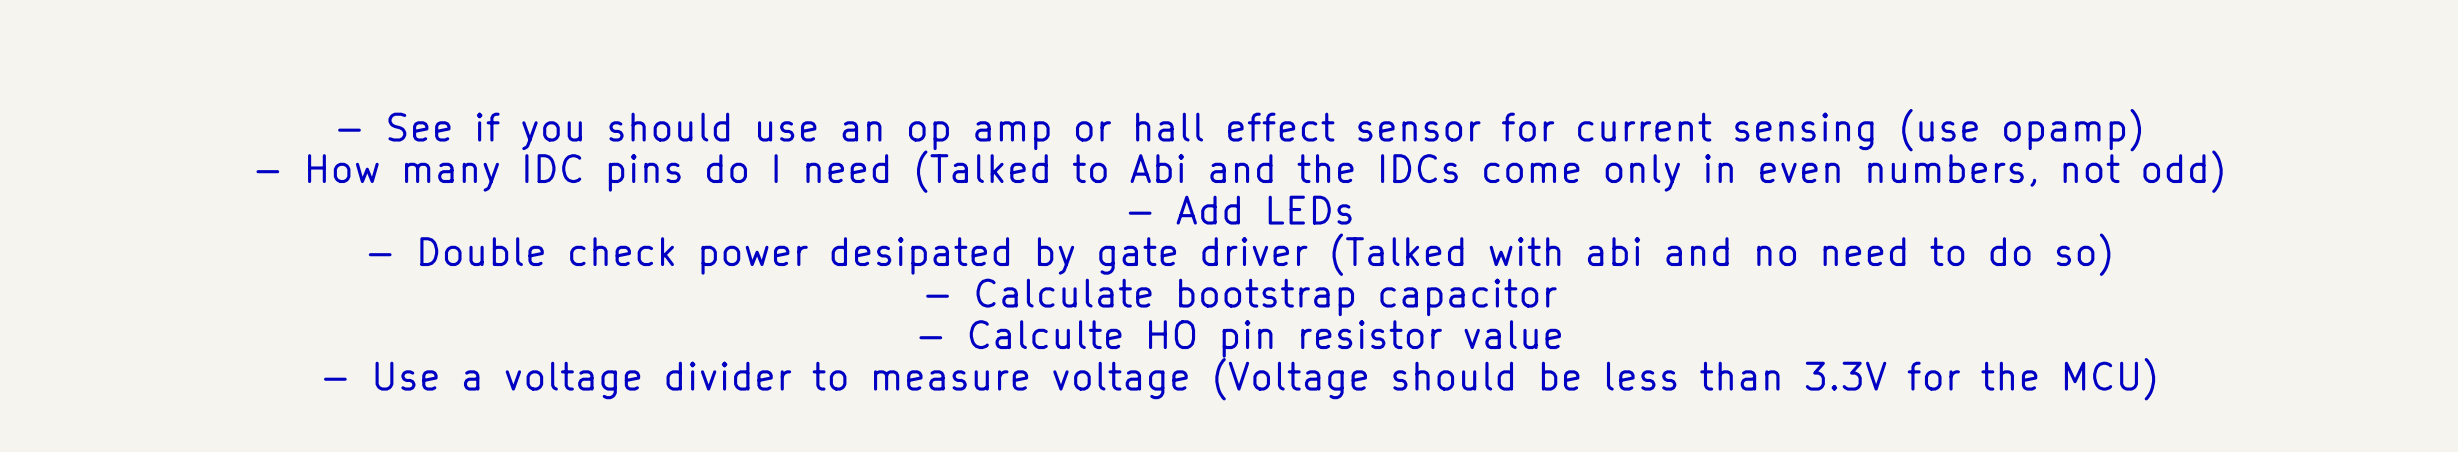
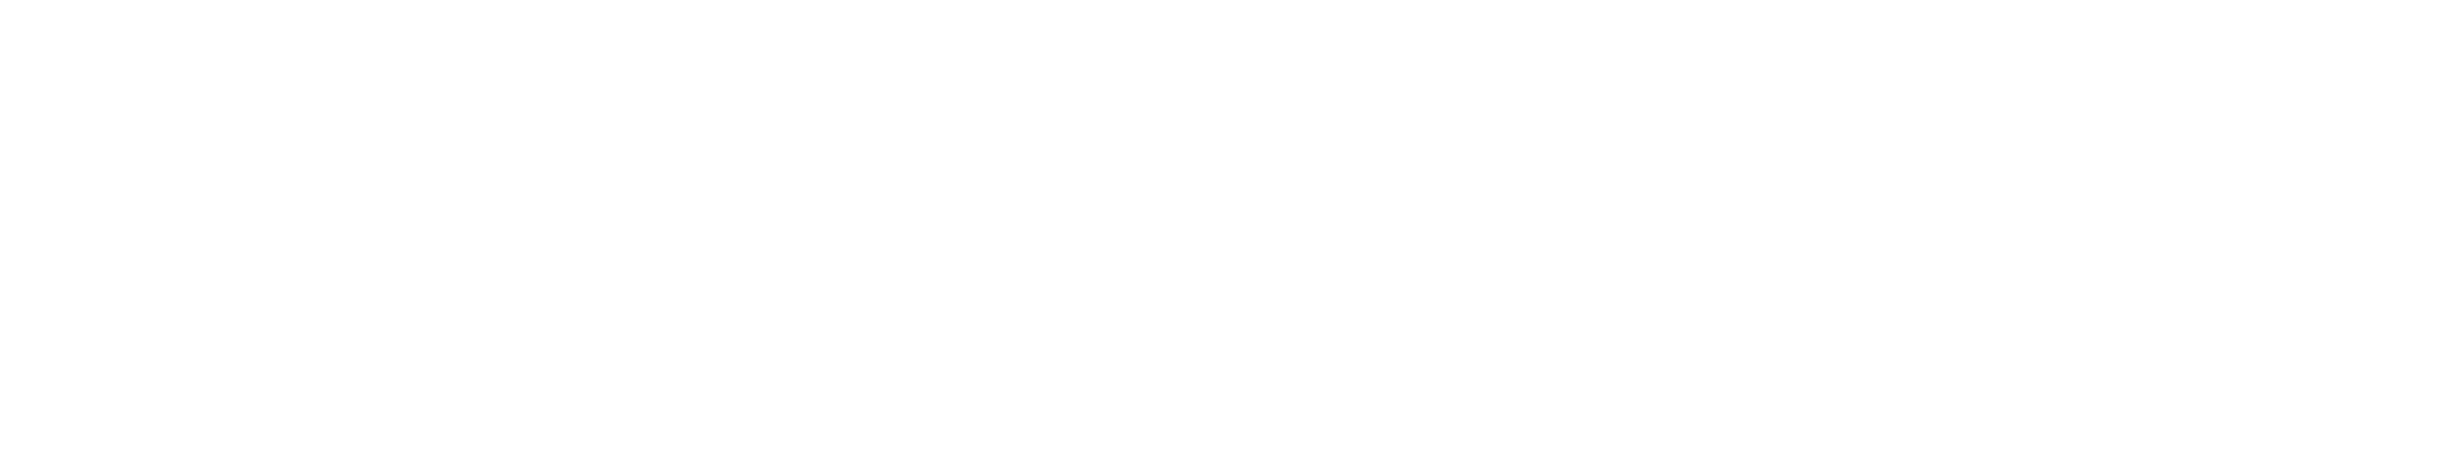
text: - See if you should use an op amp or hall effect sensor for current sensing (use opamp) (1239, 130) -> none
text: - How many IDC pins do I need (Talked to Abi and the IDCs come only in even numbers, not odd) (1239, 171) -> none
text: - Add LEDs (1240, 210) -> none
text: - Double check power desipated by gate driver (Talked with abi and no need to do so) (1239, 254) -> none
text: - Calculate bootstrap capacitor (1241, 297) -> none
text: - Calculte HO pin resistor value (1240, 338) -> none
text: - Use a voltage divider to measure voltage (Voltage should be less than 3.3V for the MCU) (1239, 379) -> none

